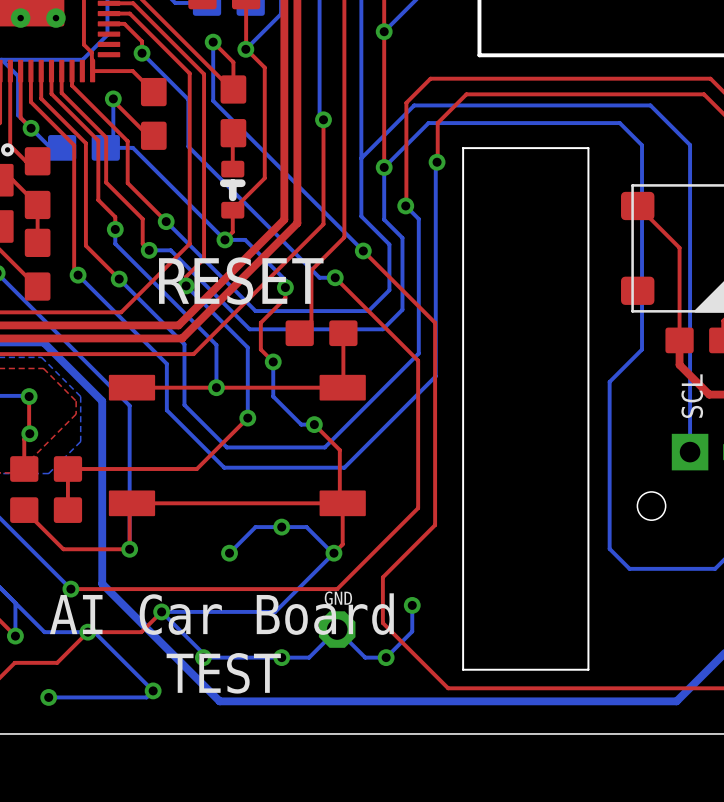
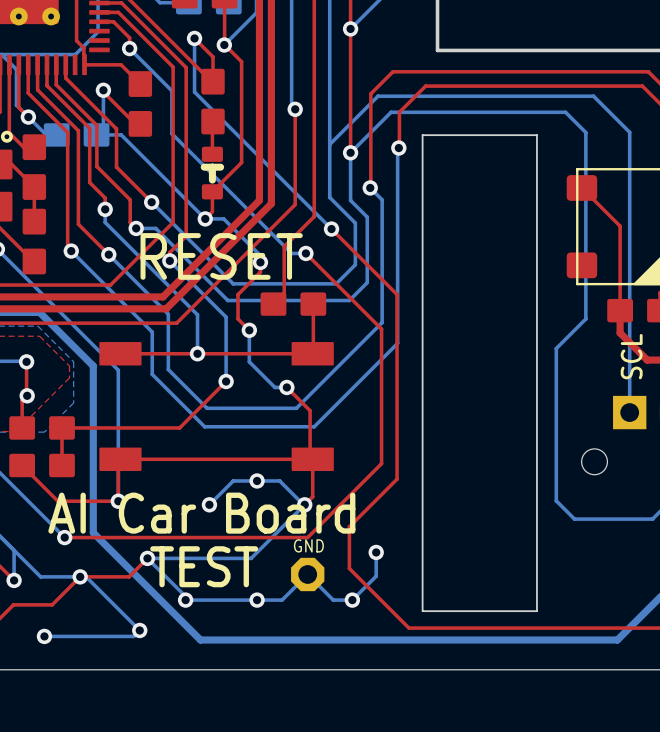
text: none -> AI Car Board (201, 513)
text: AI Car Board (221, 614) -> TEST (204, 566)
text: TEST (223, 673) -> none

